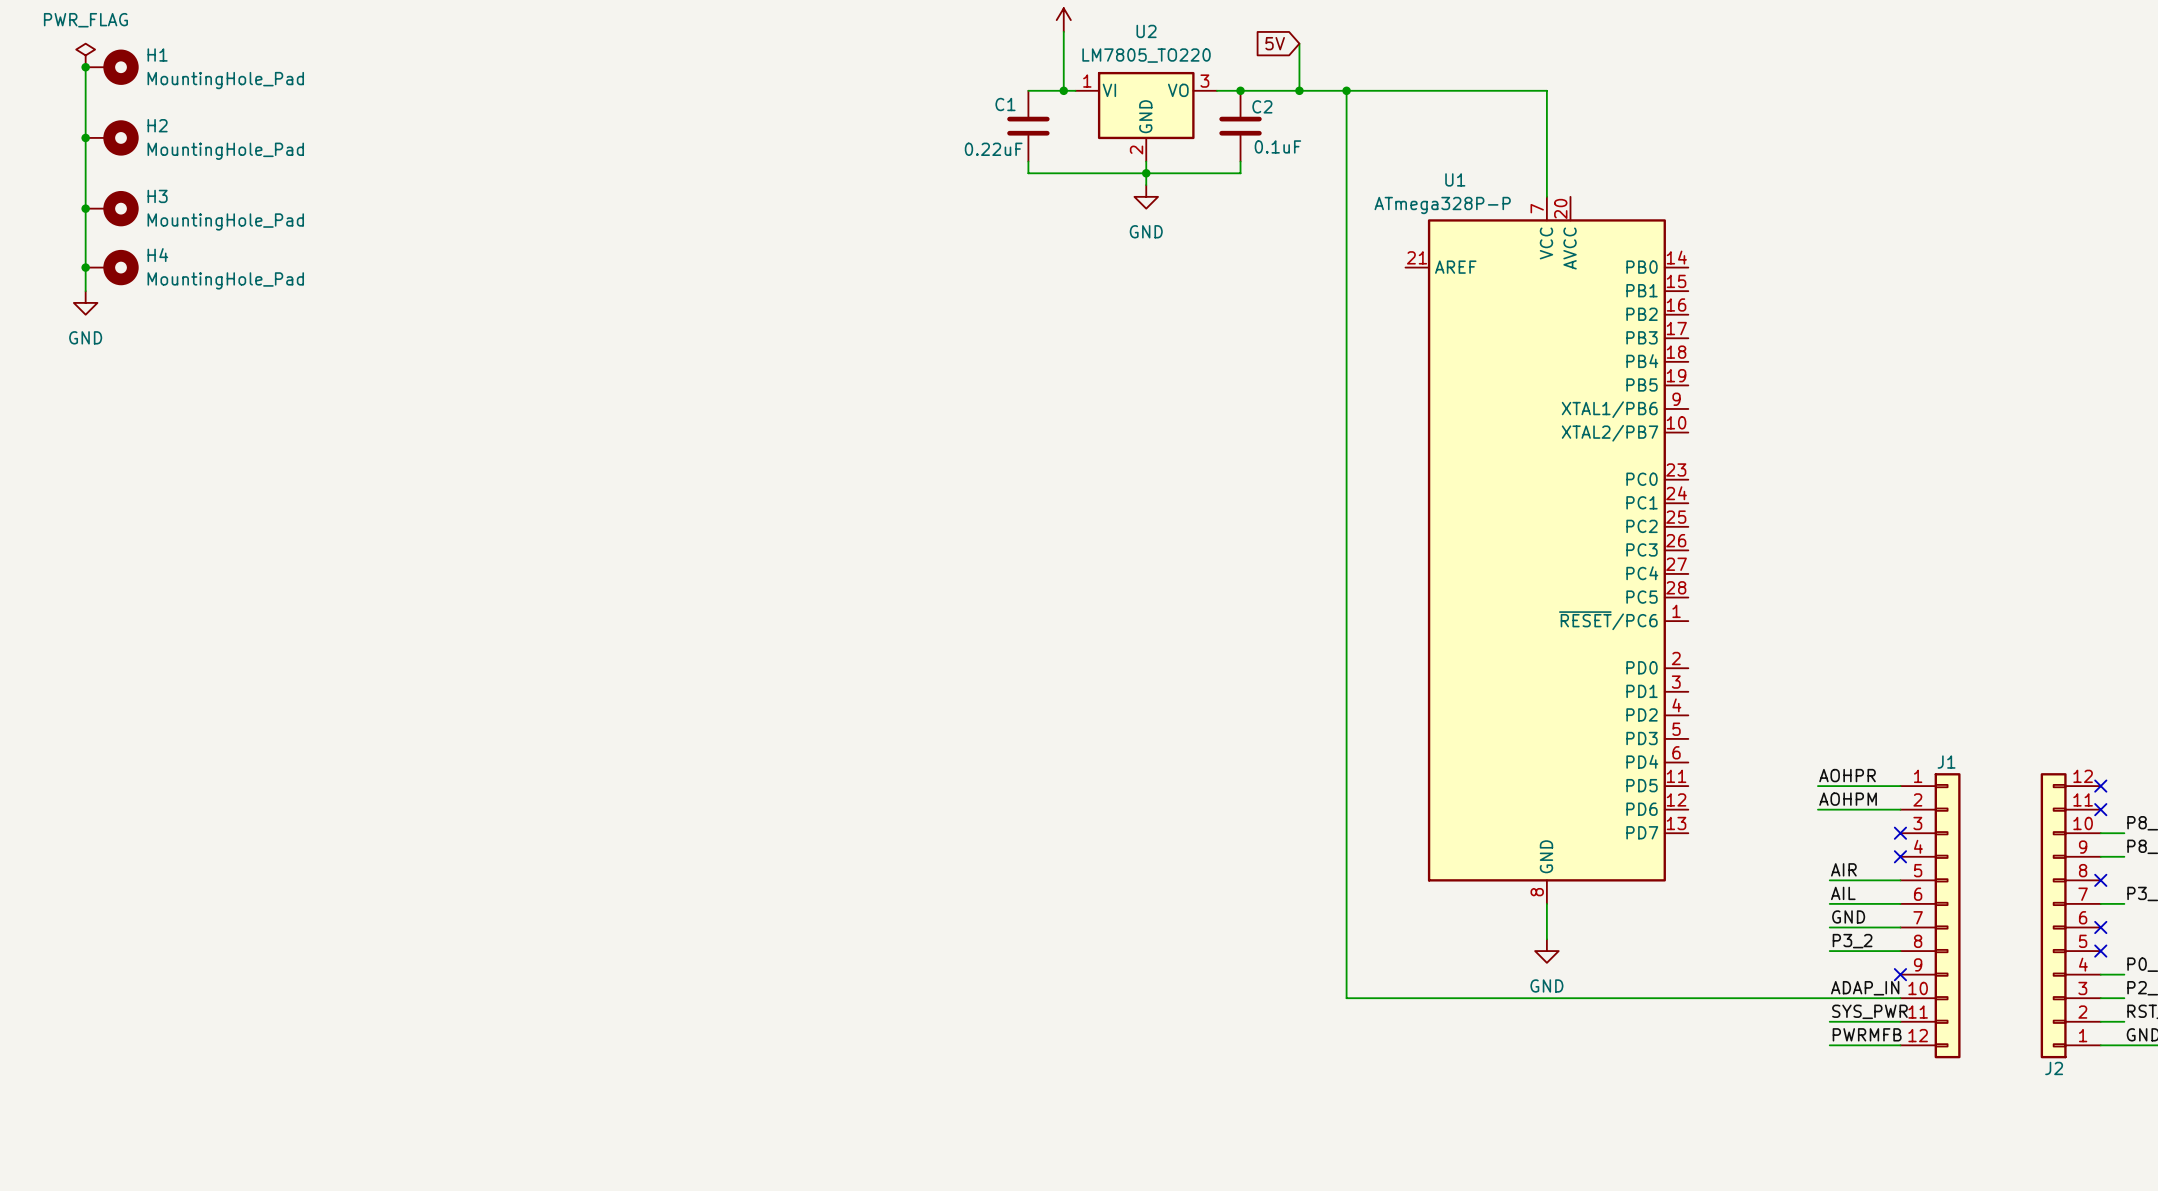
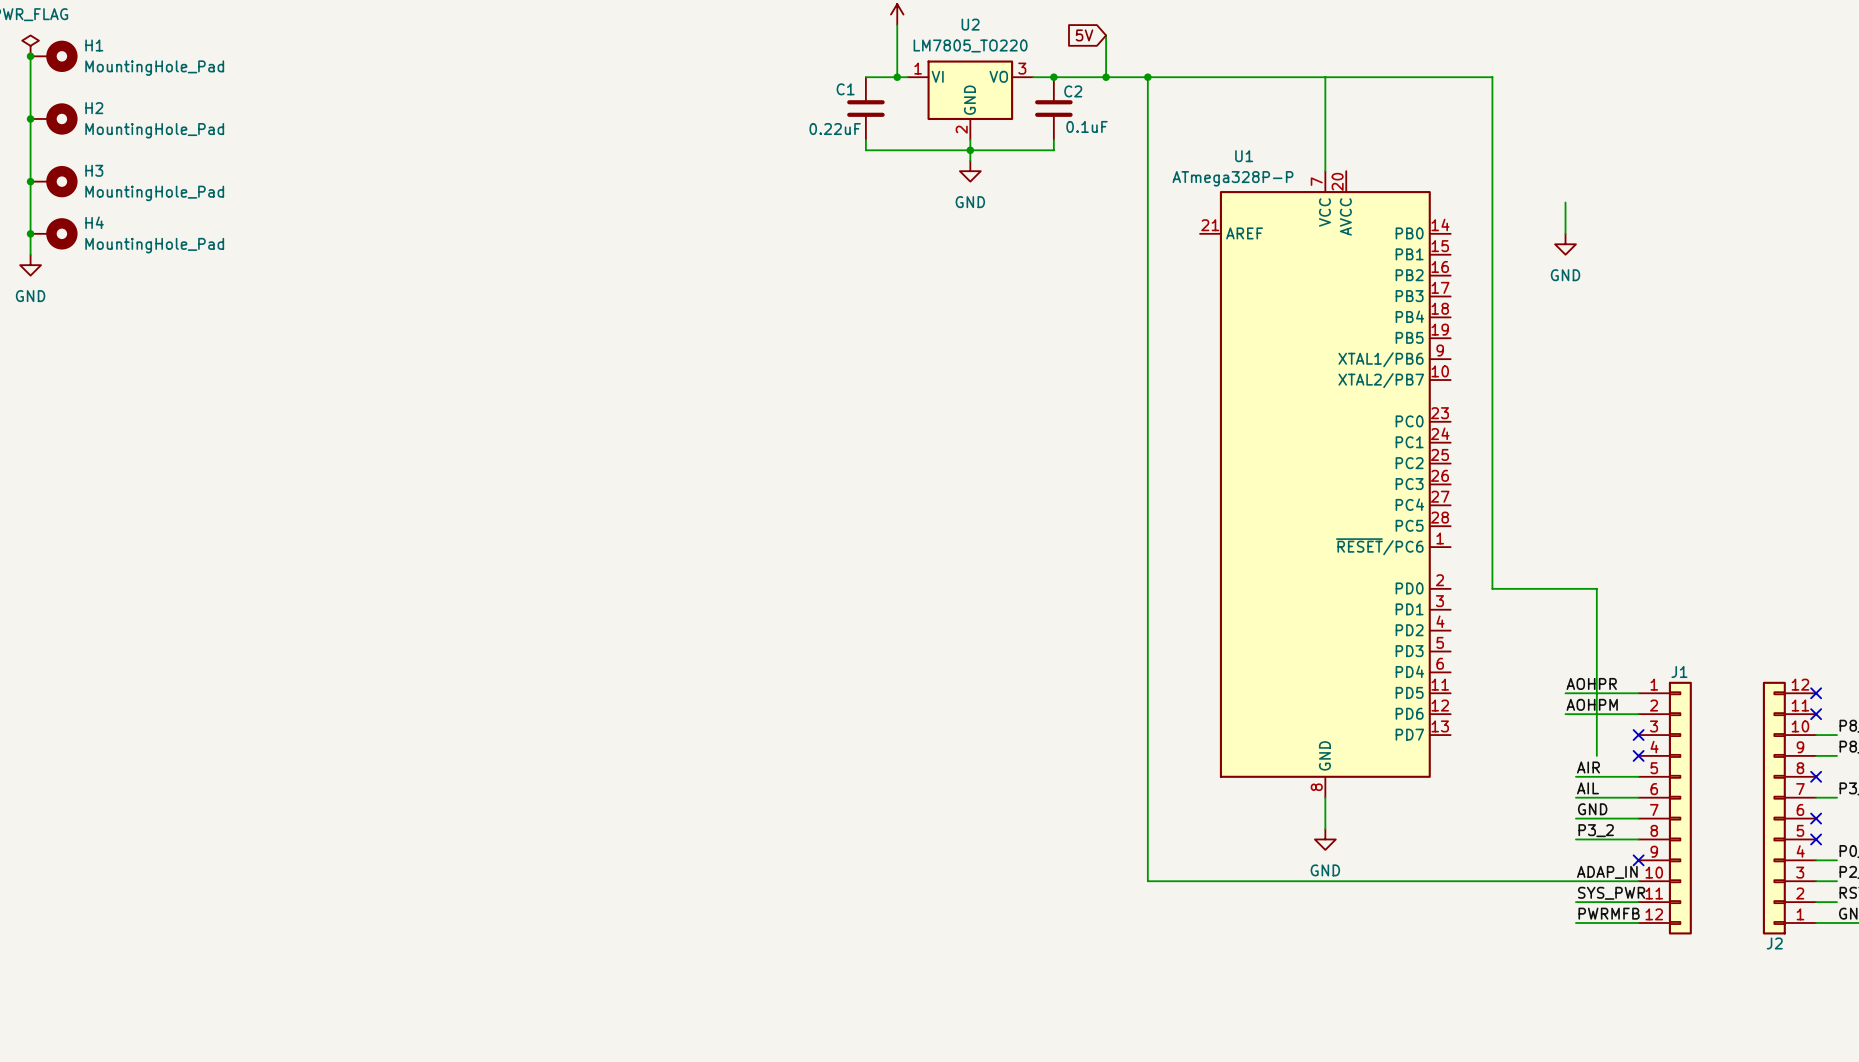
wire: none -> (1325, 77) (1492, 77) (1492, 588) (1596, 588) (1596, 755)
wire: none -> (1565, 202) (1565, 233)
power symbol: none -> GND (1565, 244)

